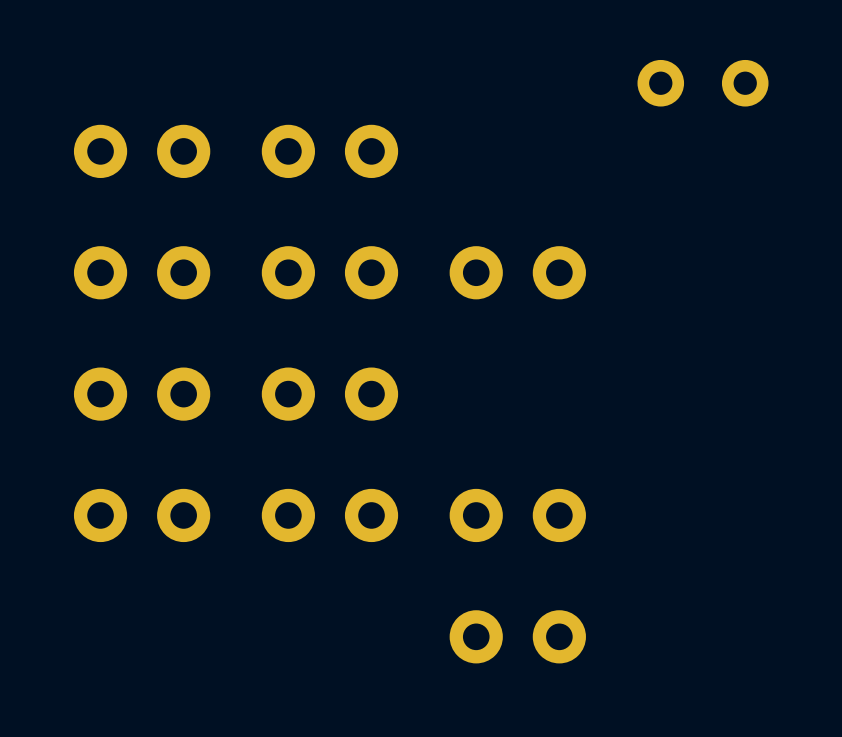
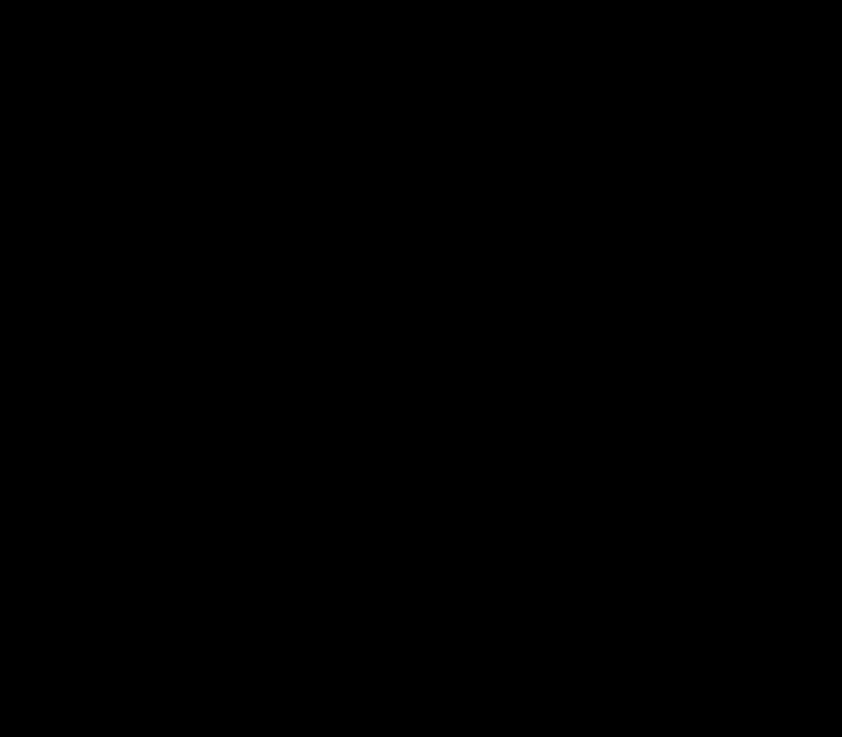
part: (703, 83) -> none
part: (142, 151) -> none
part: (329, 151) -> none
part: (142, 272) -> none
part: (329, 272) -> none
part: (517, 272) -> none
part: (142, 394) -> none
part: (329, 394) -> none
part: (142, 515) -> none
part: (329, 515) -> none
part: (517, 515) -> none
part: (517, 636) -> none

